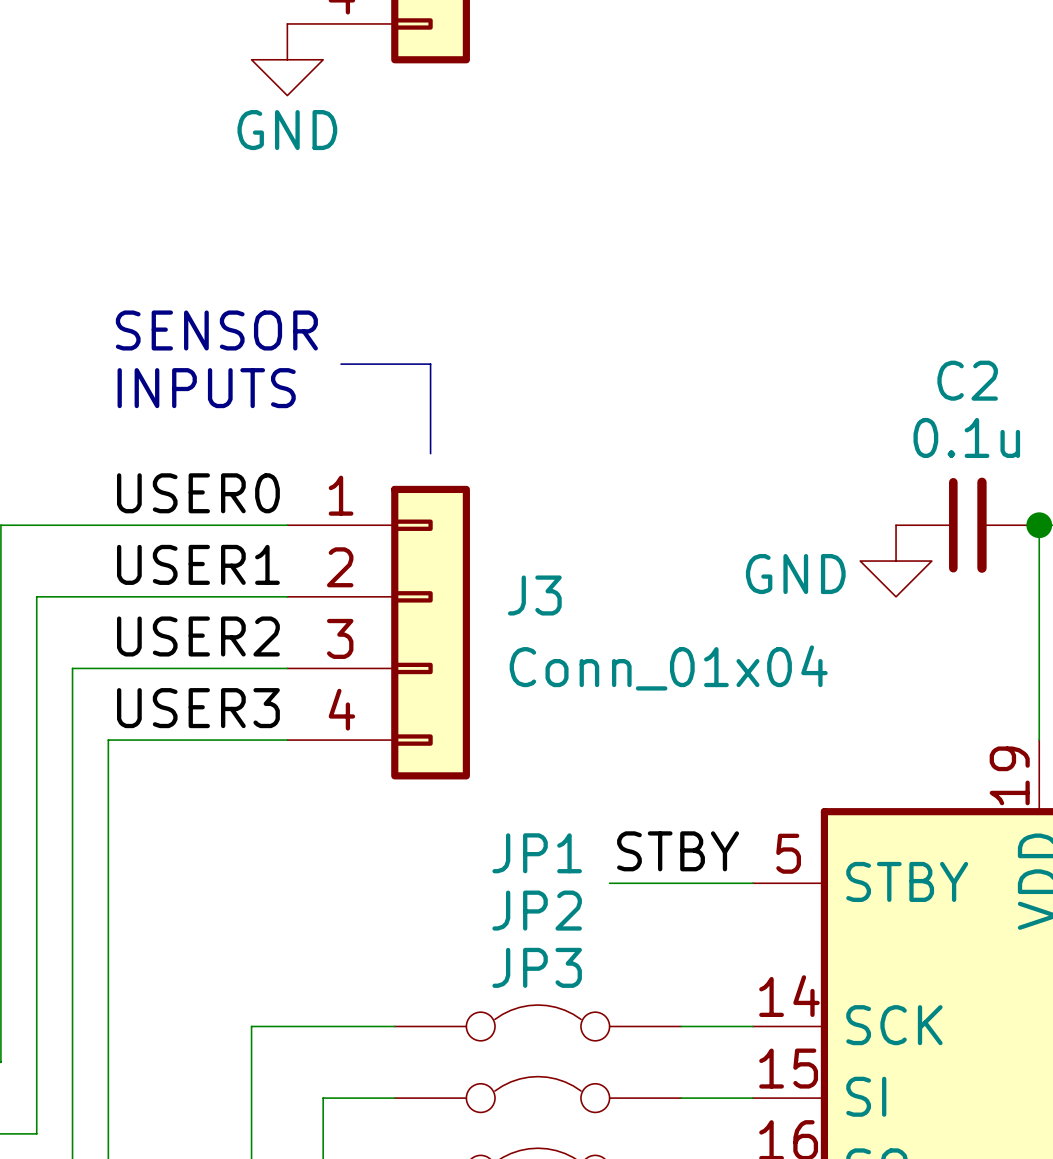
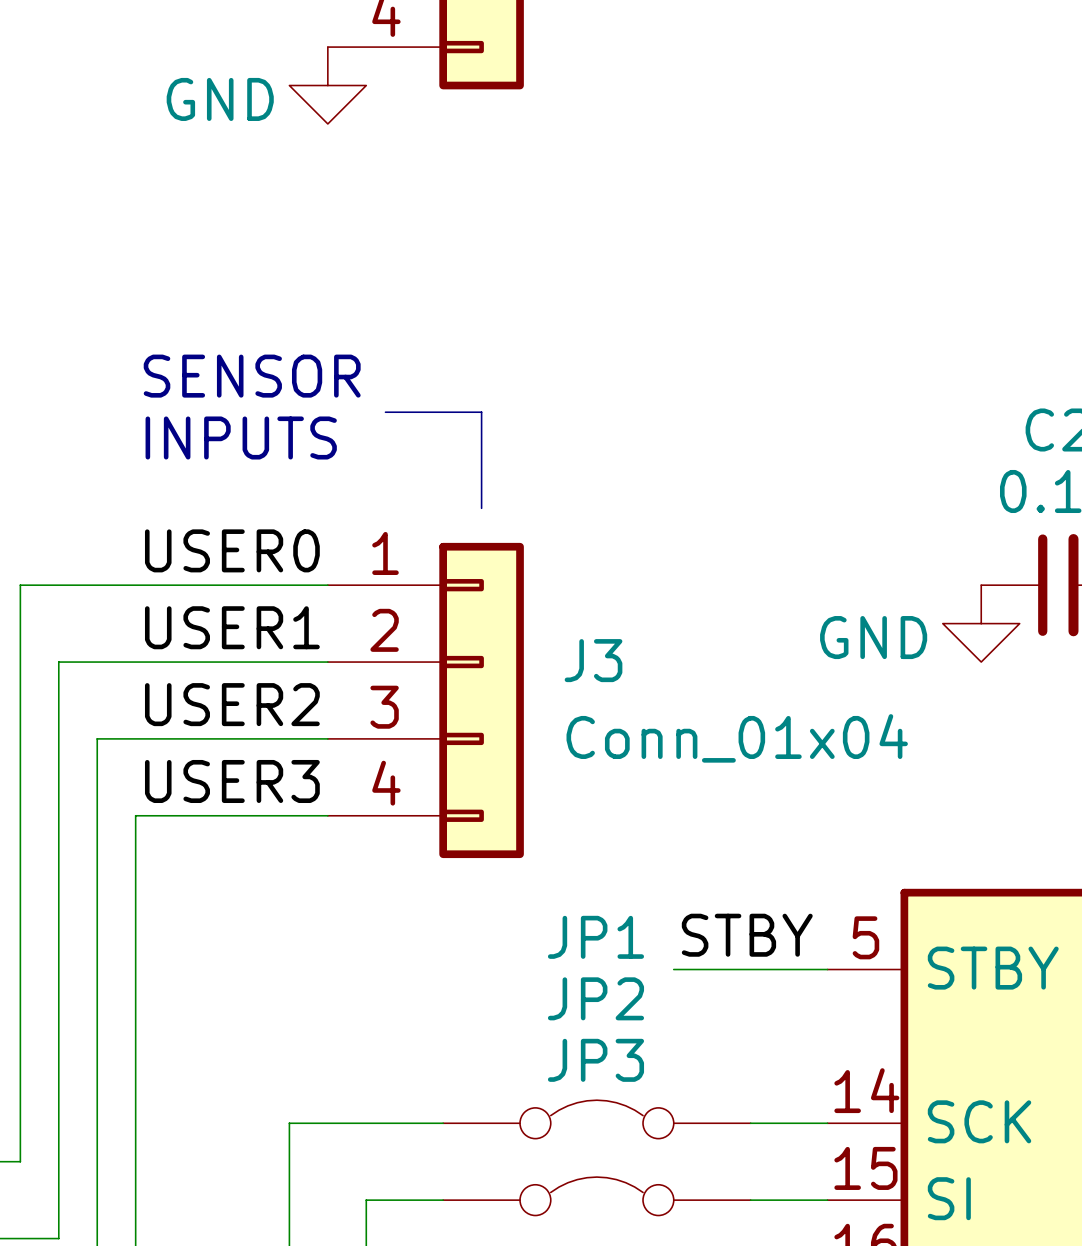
power symbol text position: GND (287, 130) -> GND (220, 99)

